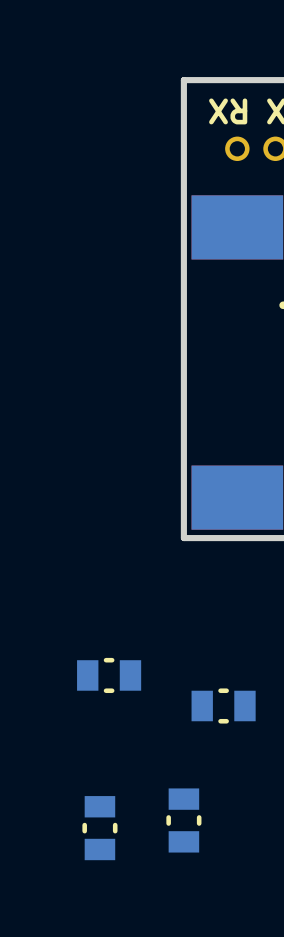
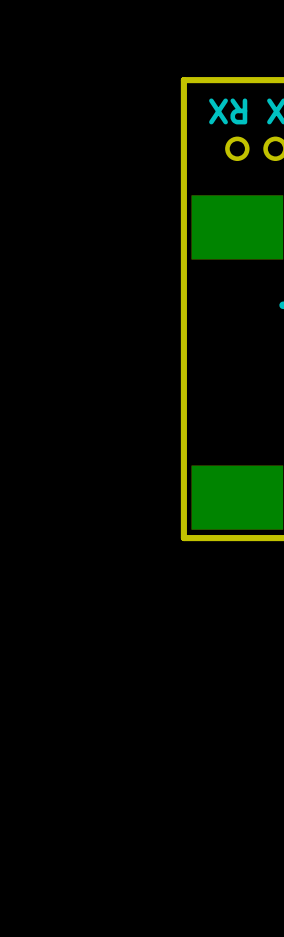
part: (109, 675) -> none
part: (223, 705) -> none
part: (183, 820) -> none
part: (99, 828) -> none

